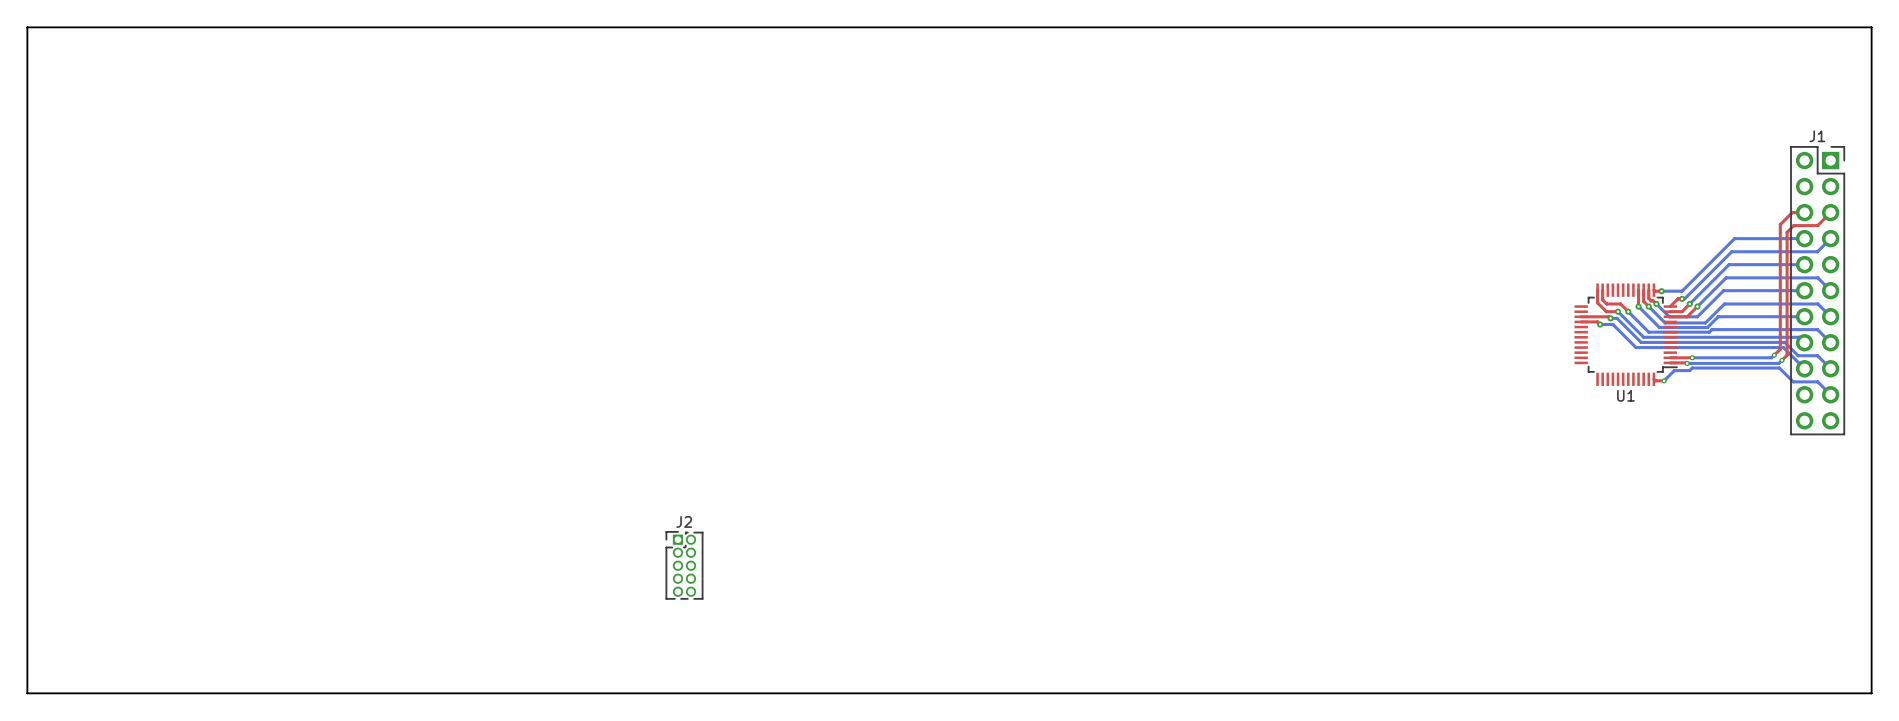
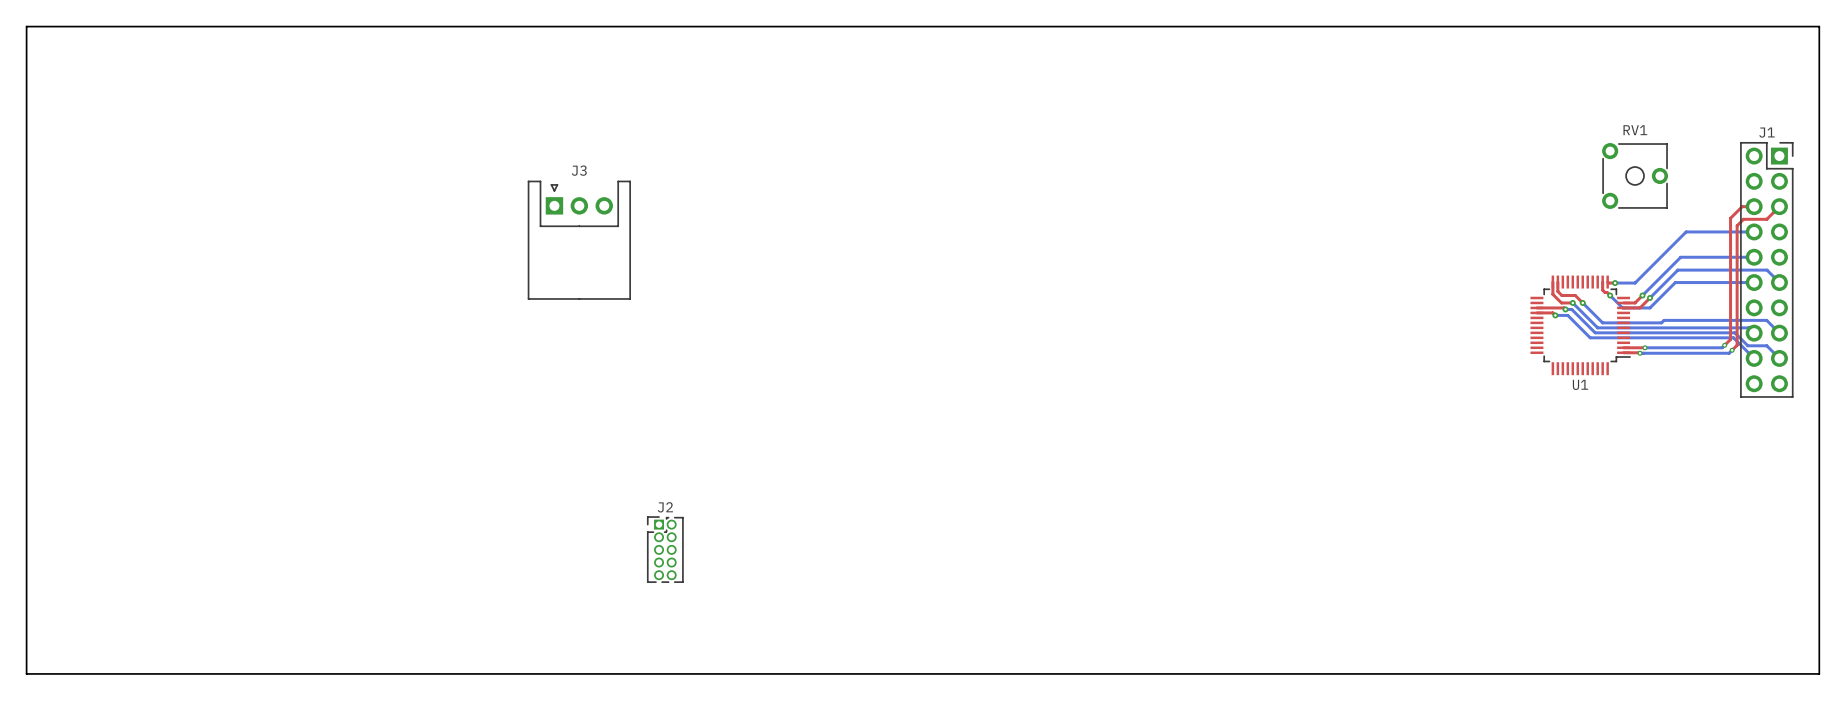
J1 footprint: [1790, 146, 1845, 436] -> [1740, 142, 1794, 398]
RV1: none -> (1635, 175)
bottom track: (1830, 238) (1817, 251) (1731, 251) (1684, 298) (1682, 298) -> none
J3: none -> (579, 240)
top track: (1638, 290) (1638, 306) -> none
top track: (1643, 290) (1643, 301) (1648, 306) -> none
top track: (1682, 298) (1677, 298) (1670, 306) -> none
via: (1682, 298) -> none
bottom track: (1638, 306) (1659, 327) (1707, 327) (1718, 316) (1804, 316) -> none
via: (1638, 306) -> none
bottom track: (1648, 306) (1665, 322) (1705, 322) (1724, 303) (1817, 303) (1830, 316) -> none
via: (1648, 306) -> none
top track: (1653, 379) (1664, 380) -> none
bottom track: (1664, 380) (1674, 370) (1689, 370) (1692, 368) (1779, 368) (1793, 381) (1817, 381) (1830, 394) -> none
via: (1664, 380) -> none

